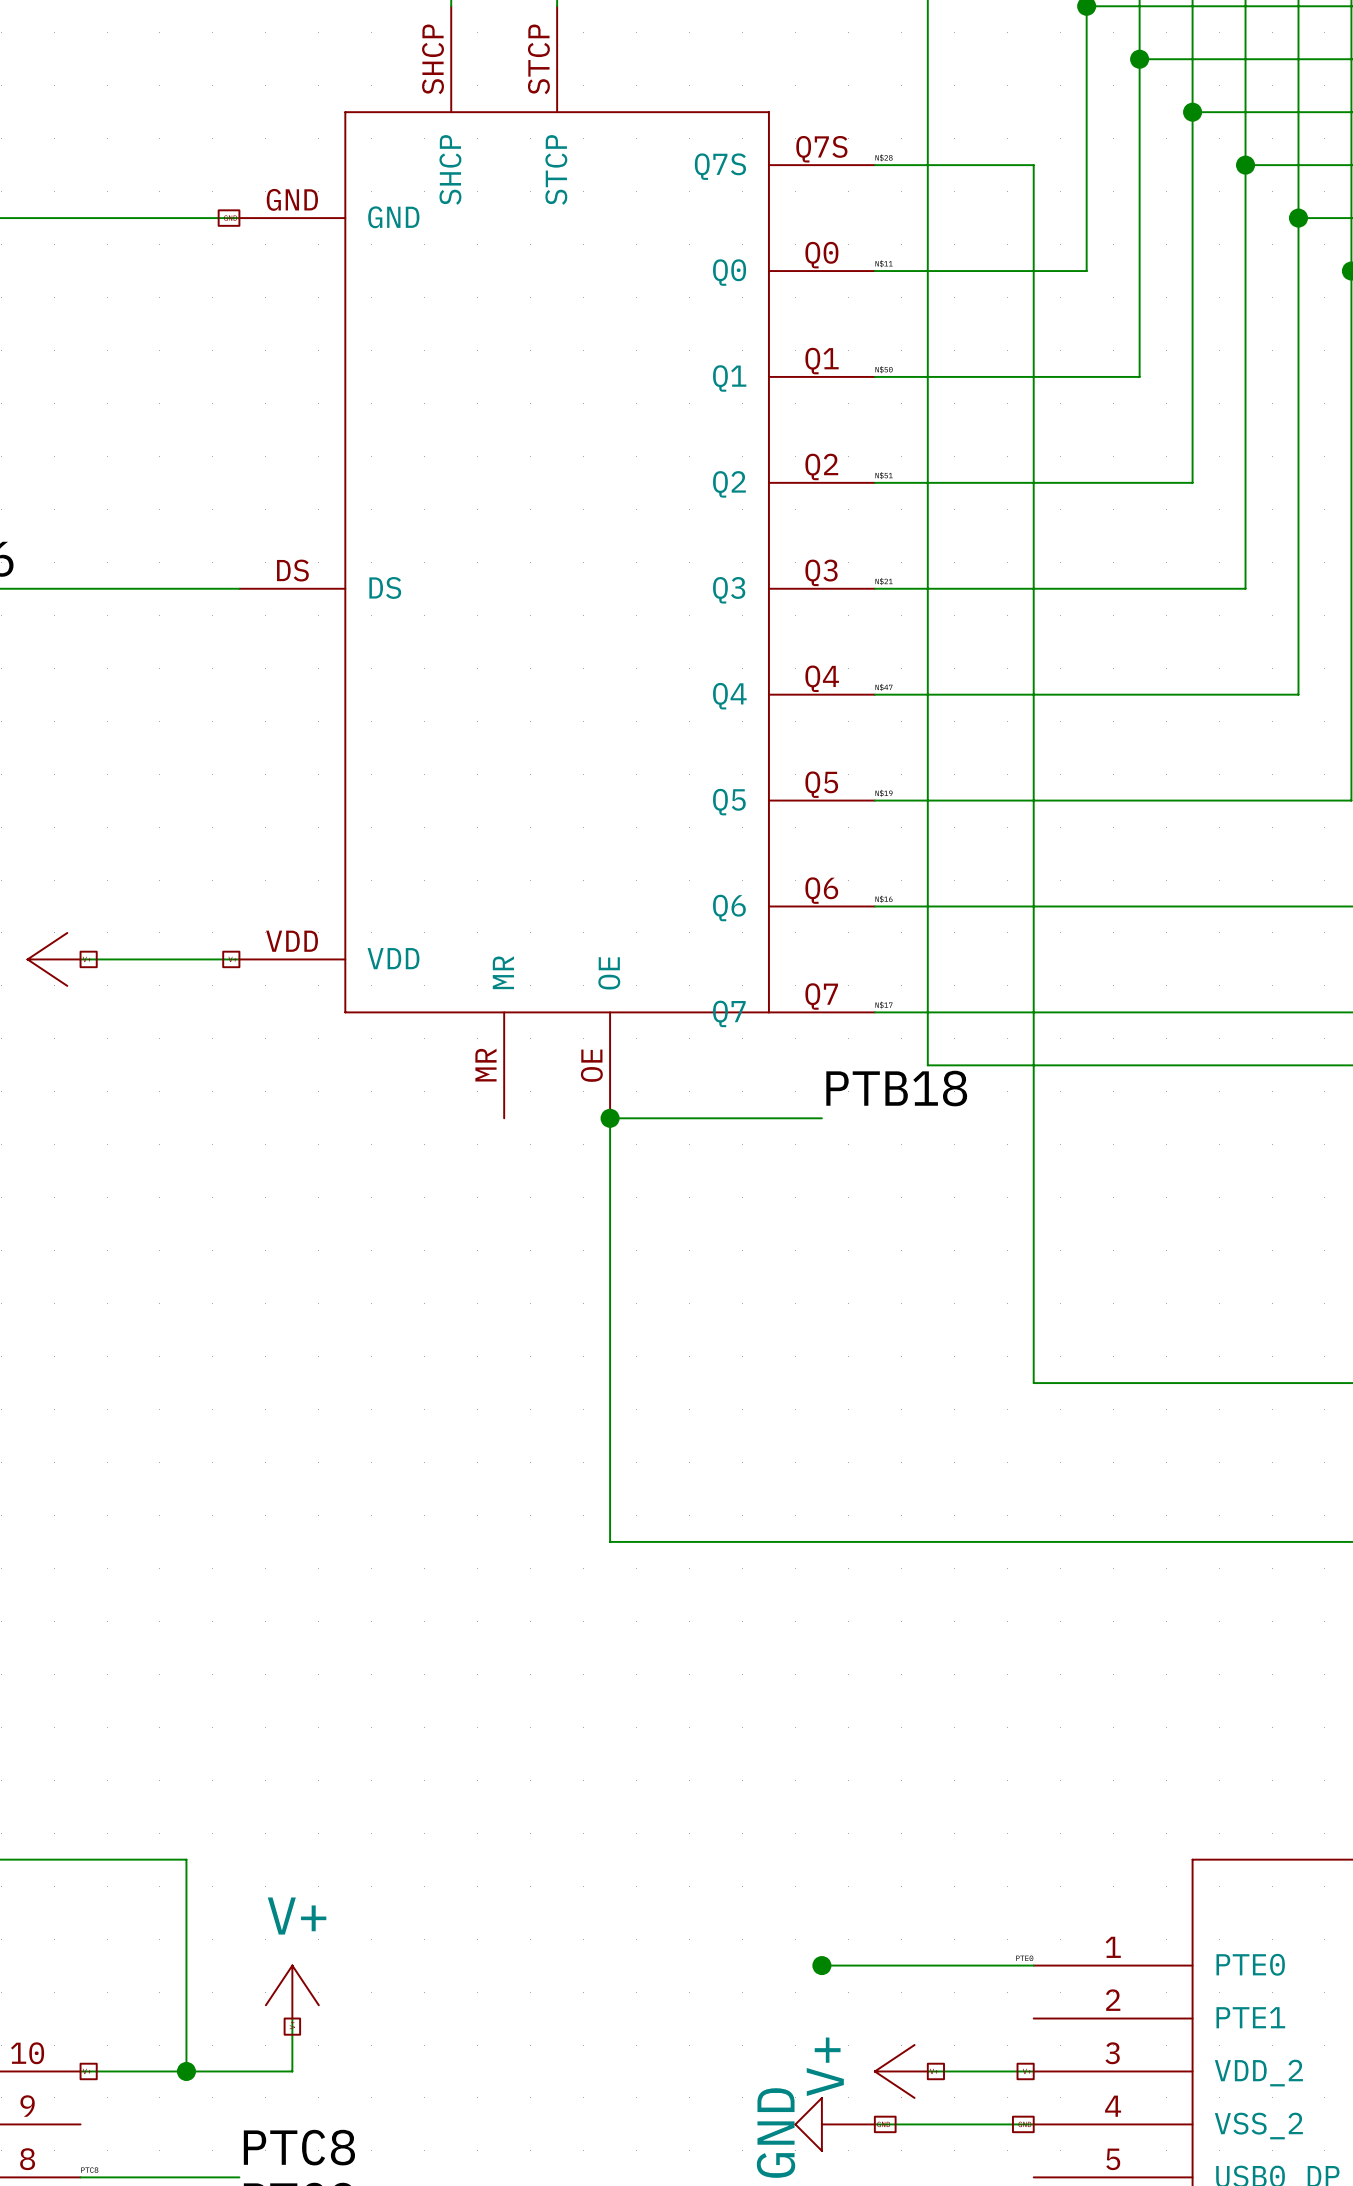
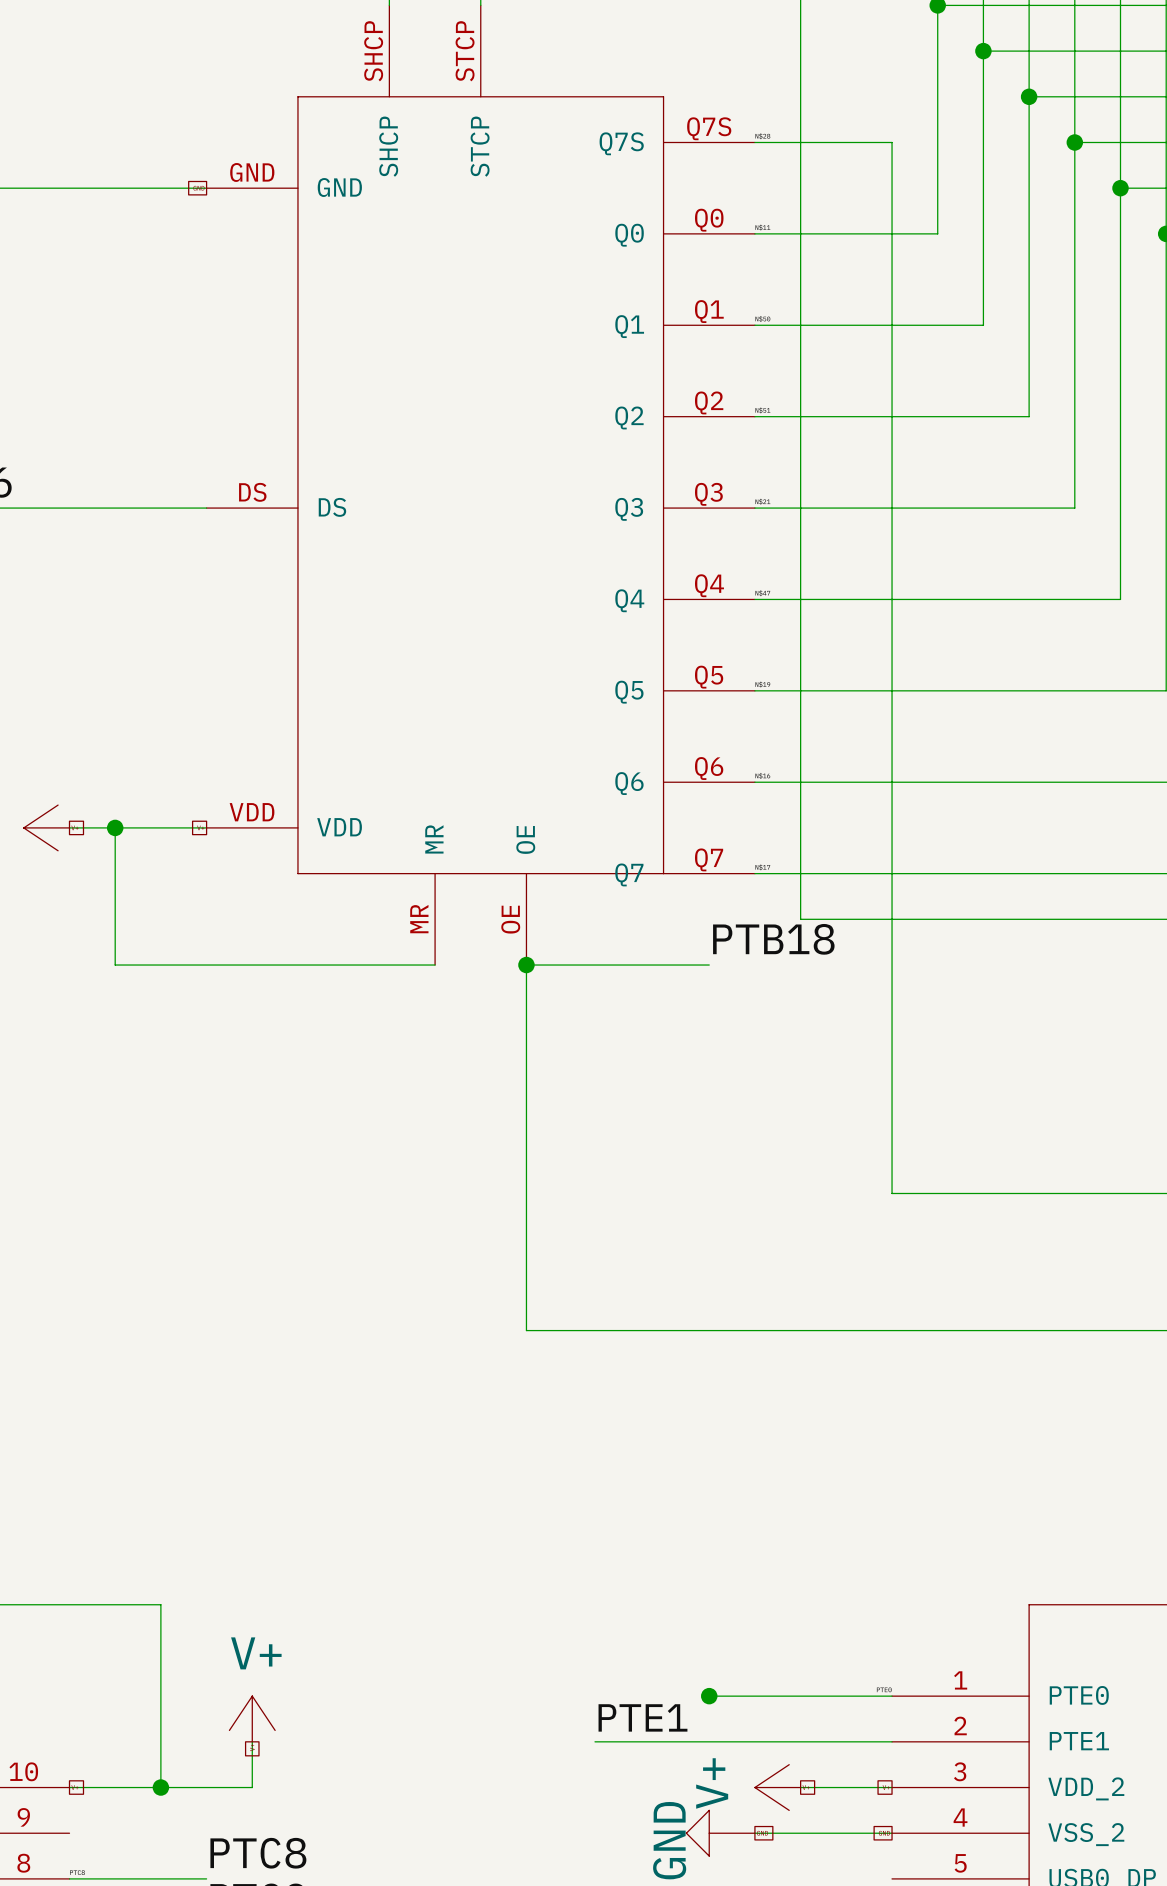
wire: none -> (115, 827) (115, 965) (435, 965)
junction: none -> (115, 827)
label: none -> PTE1 (642, 1717)
wire: none -> (595, 1741) (892, 1741)

